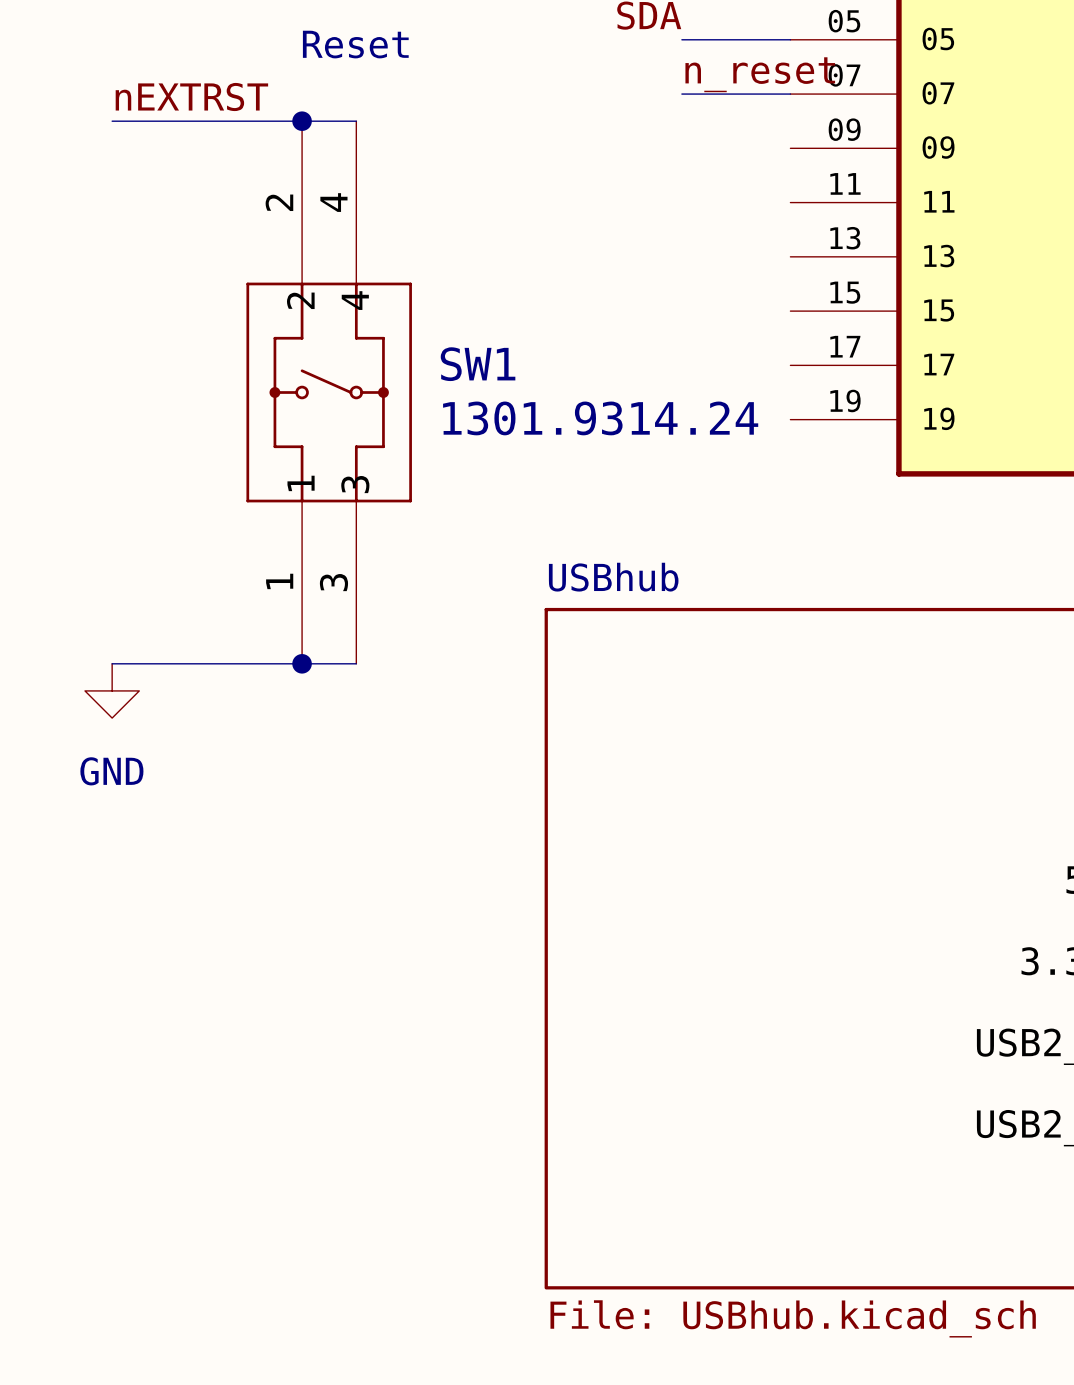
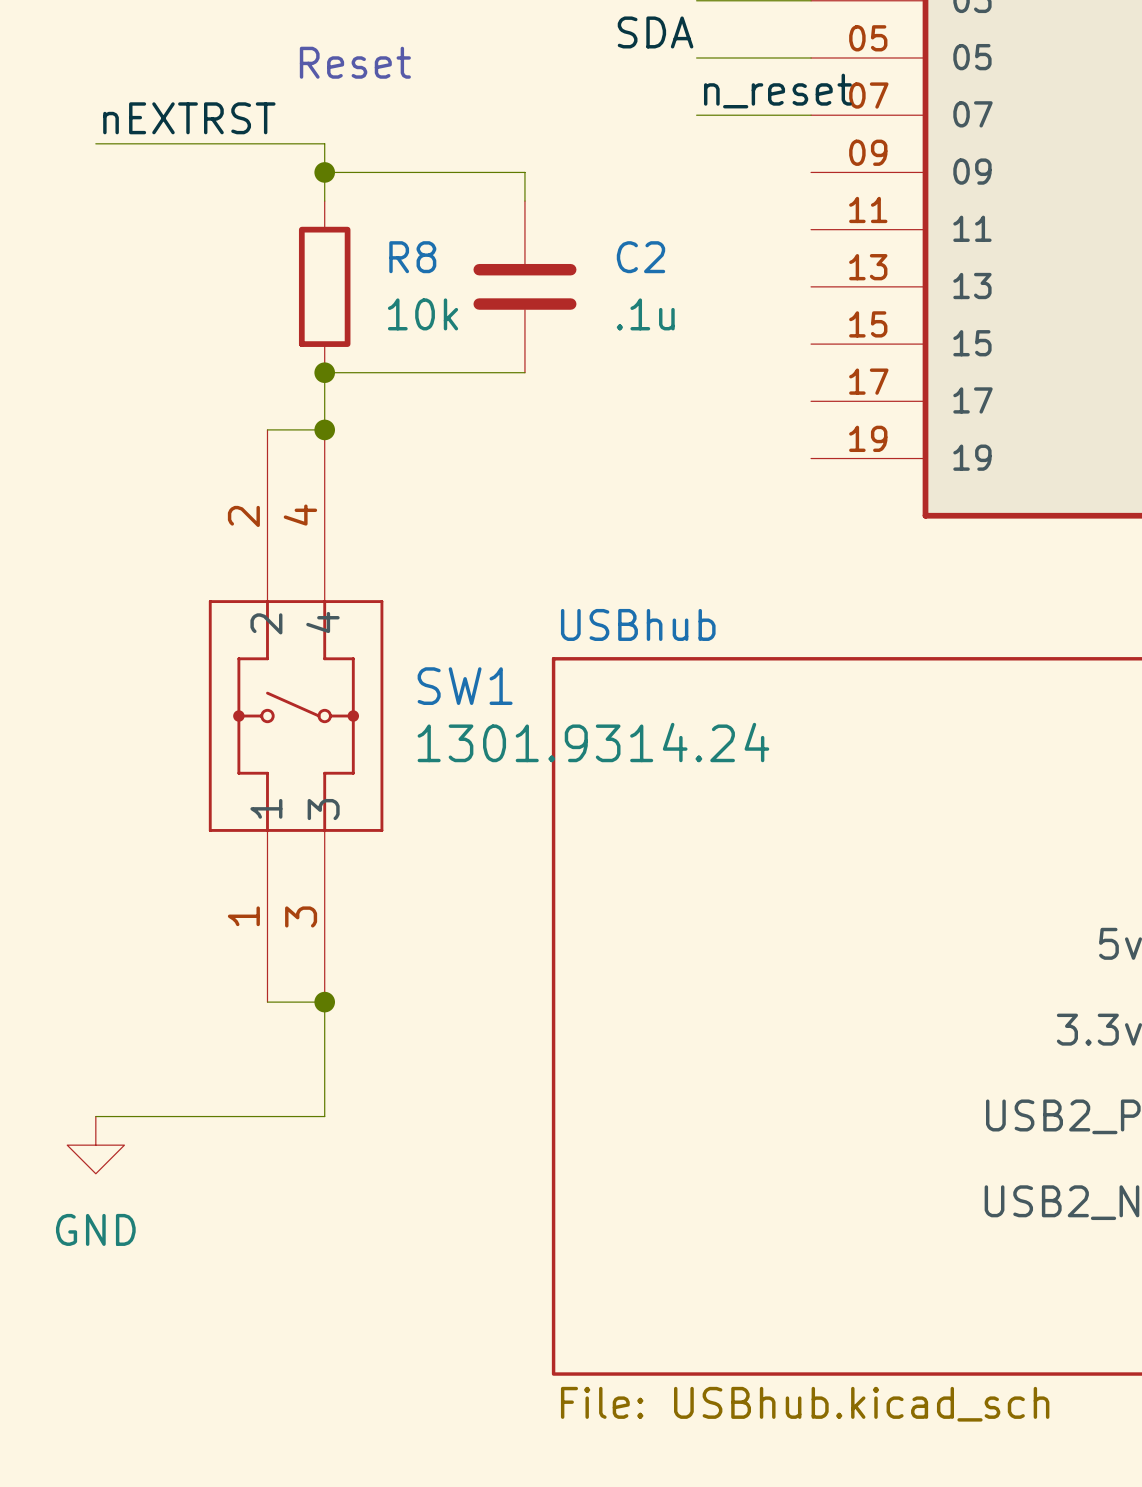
junction position: (302, 121) -> (324, 172)
wire: (329, 121) (356, 121) -> (324, 143) (324, 201)
wire: none -> (324, 172) (524, 172) (524, 201)
R8: none -> 10k (324, 286)
C2: none -> .1u (524, 286)
junction: none -> (324, 372)
wire: none -> (524, 372) (324, 372) (324, 429) (267, 429)
junction: none -> (324, 429)
SW1 position: (329, 392) -> (296, 716)
wire: (112, 663) (356, 663) -> none
junction: (302, 663) -> none
power symbol position: GND (112, 690) -> GND (95, 1145)
wire: none -> (267, 1002) (324, 1002) (324, 1116) (95, 1116)
junction: none -> (324, 1002)

